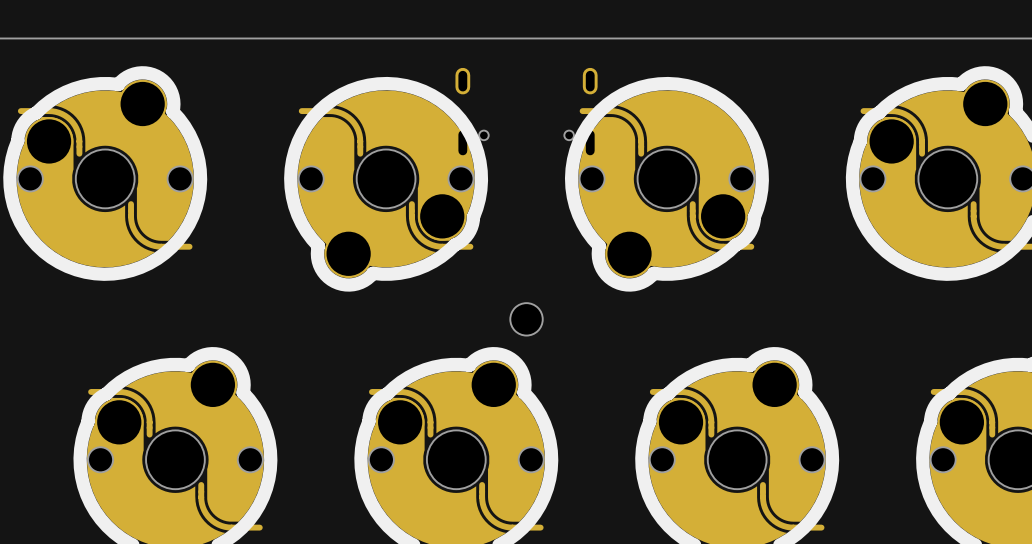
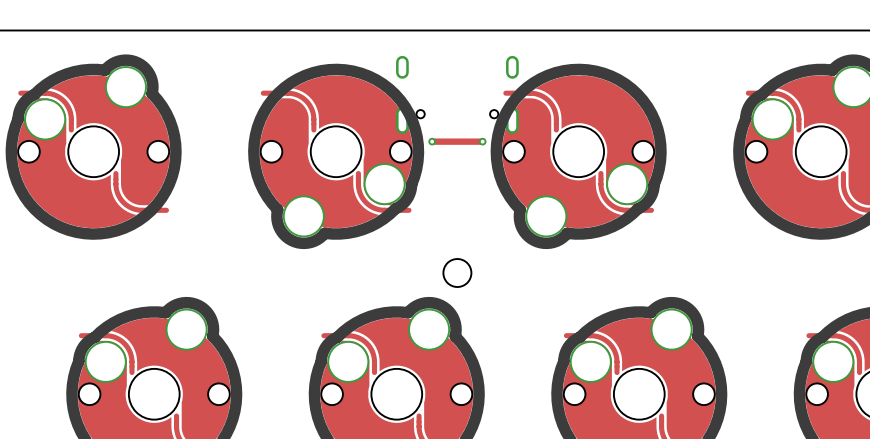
track: none -> (432, 141) (482, 141)
via: none -> (432, 141)
via: none -> (482, 141)

